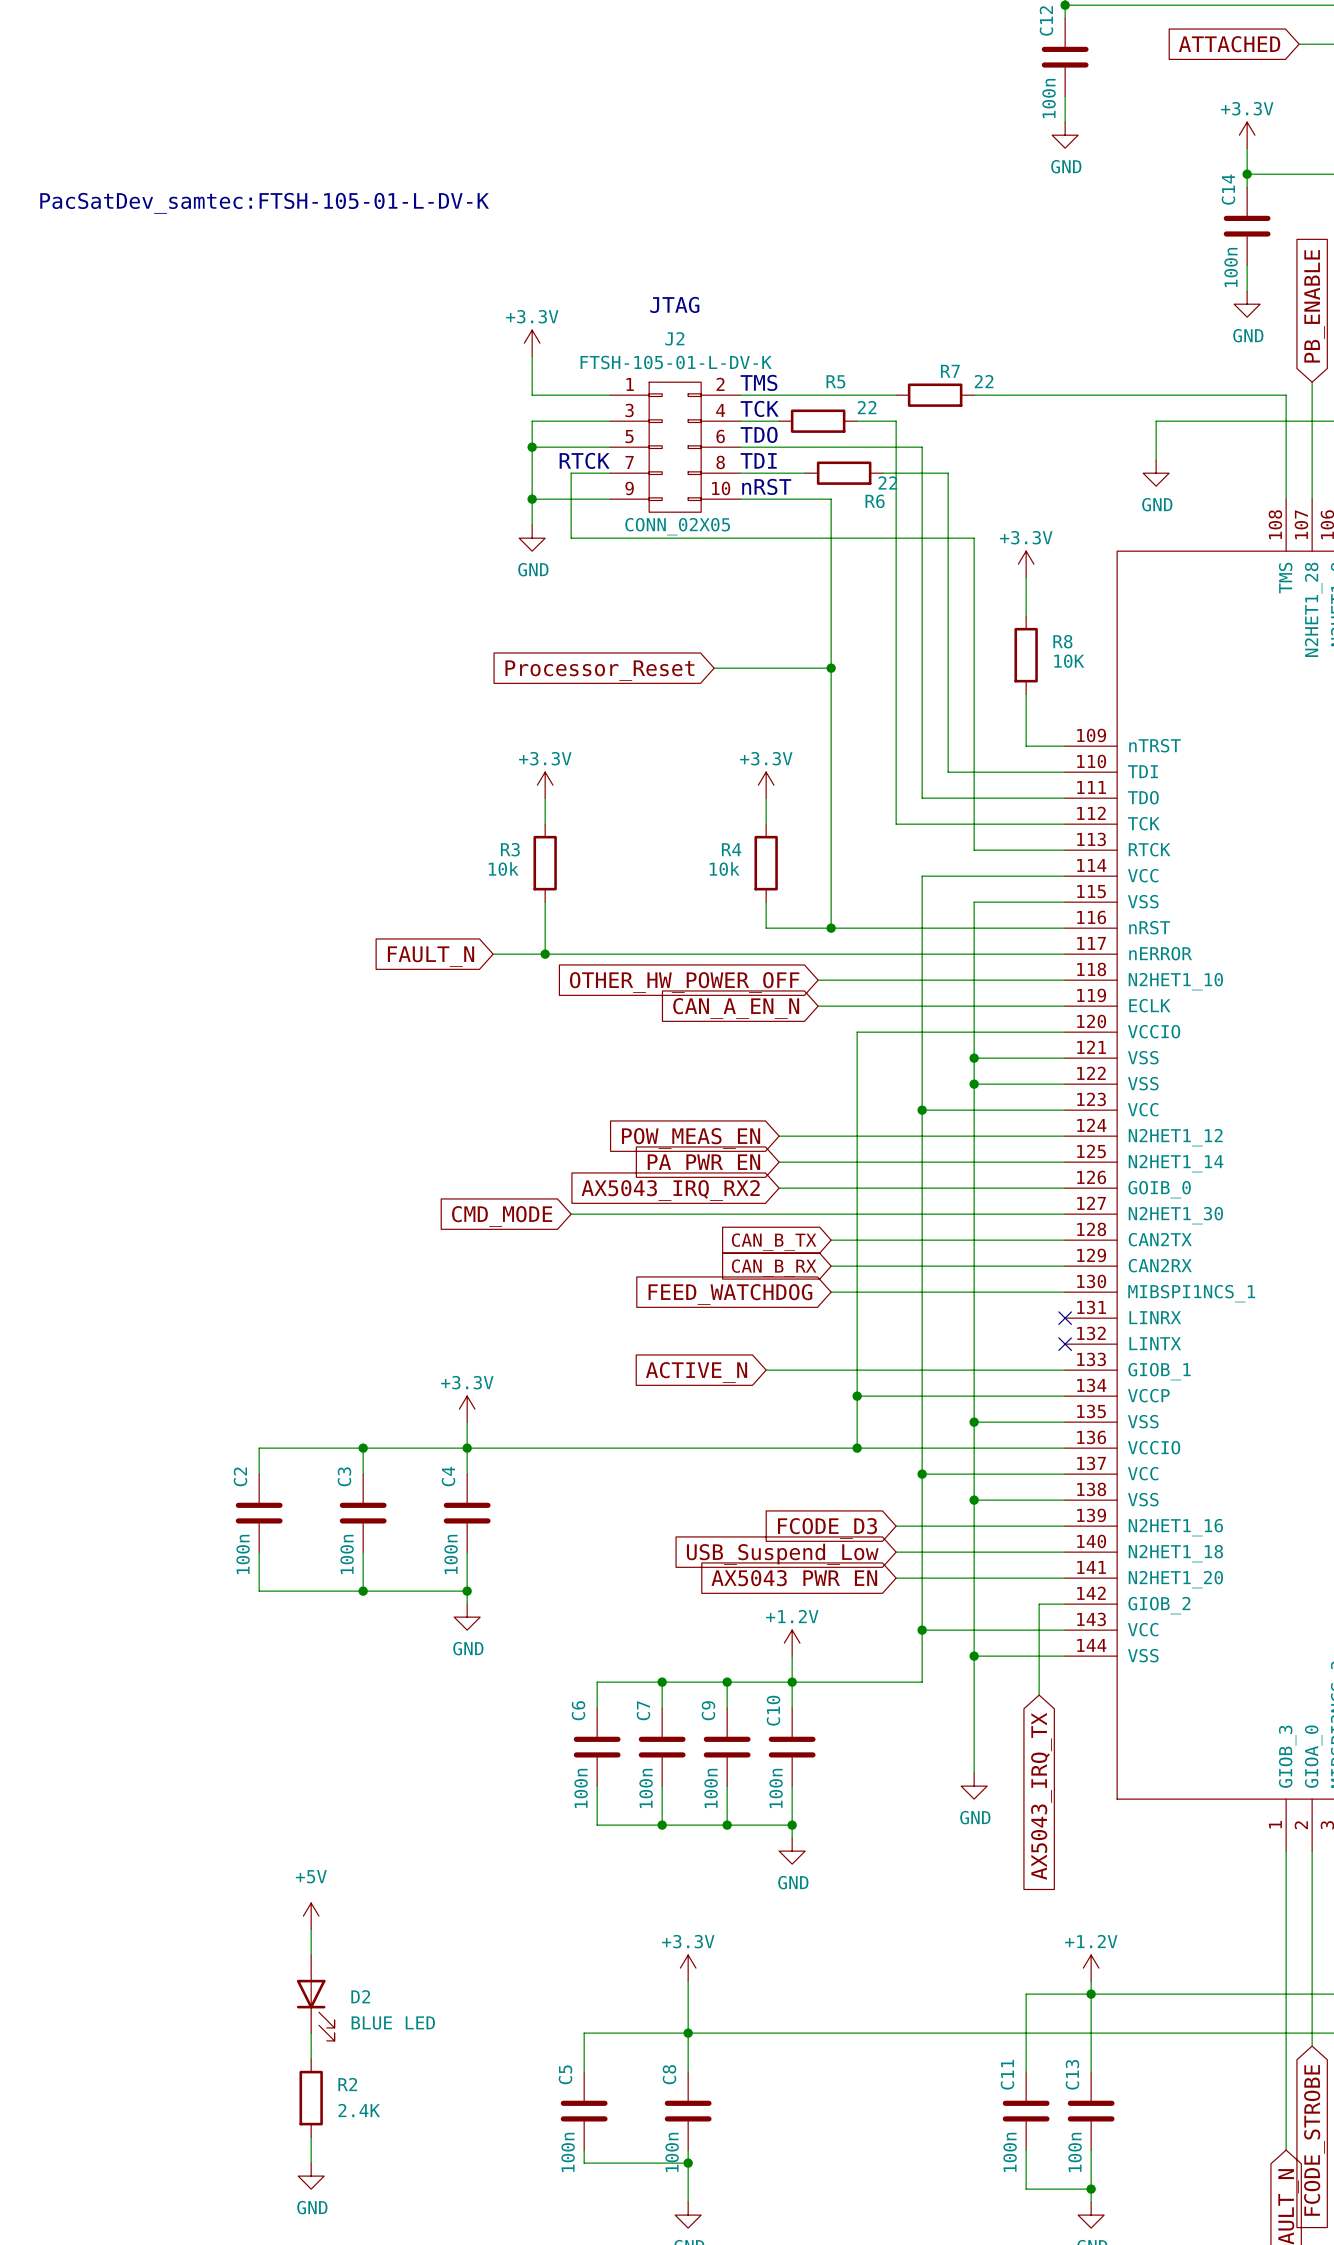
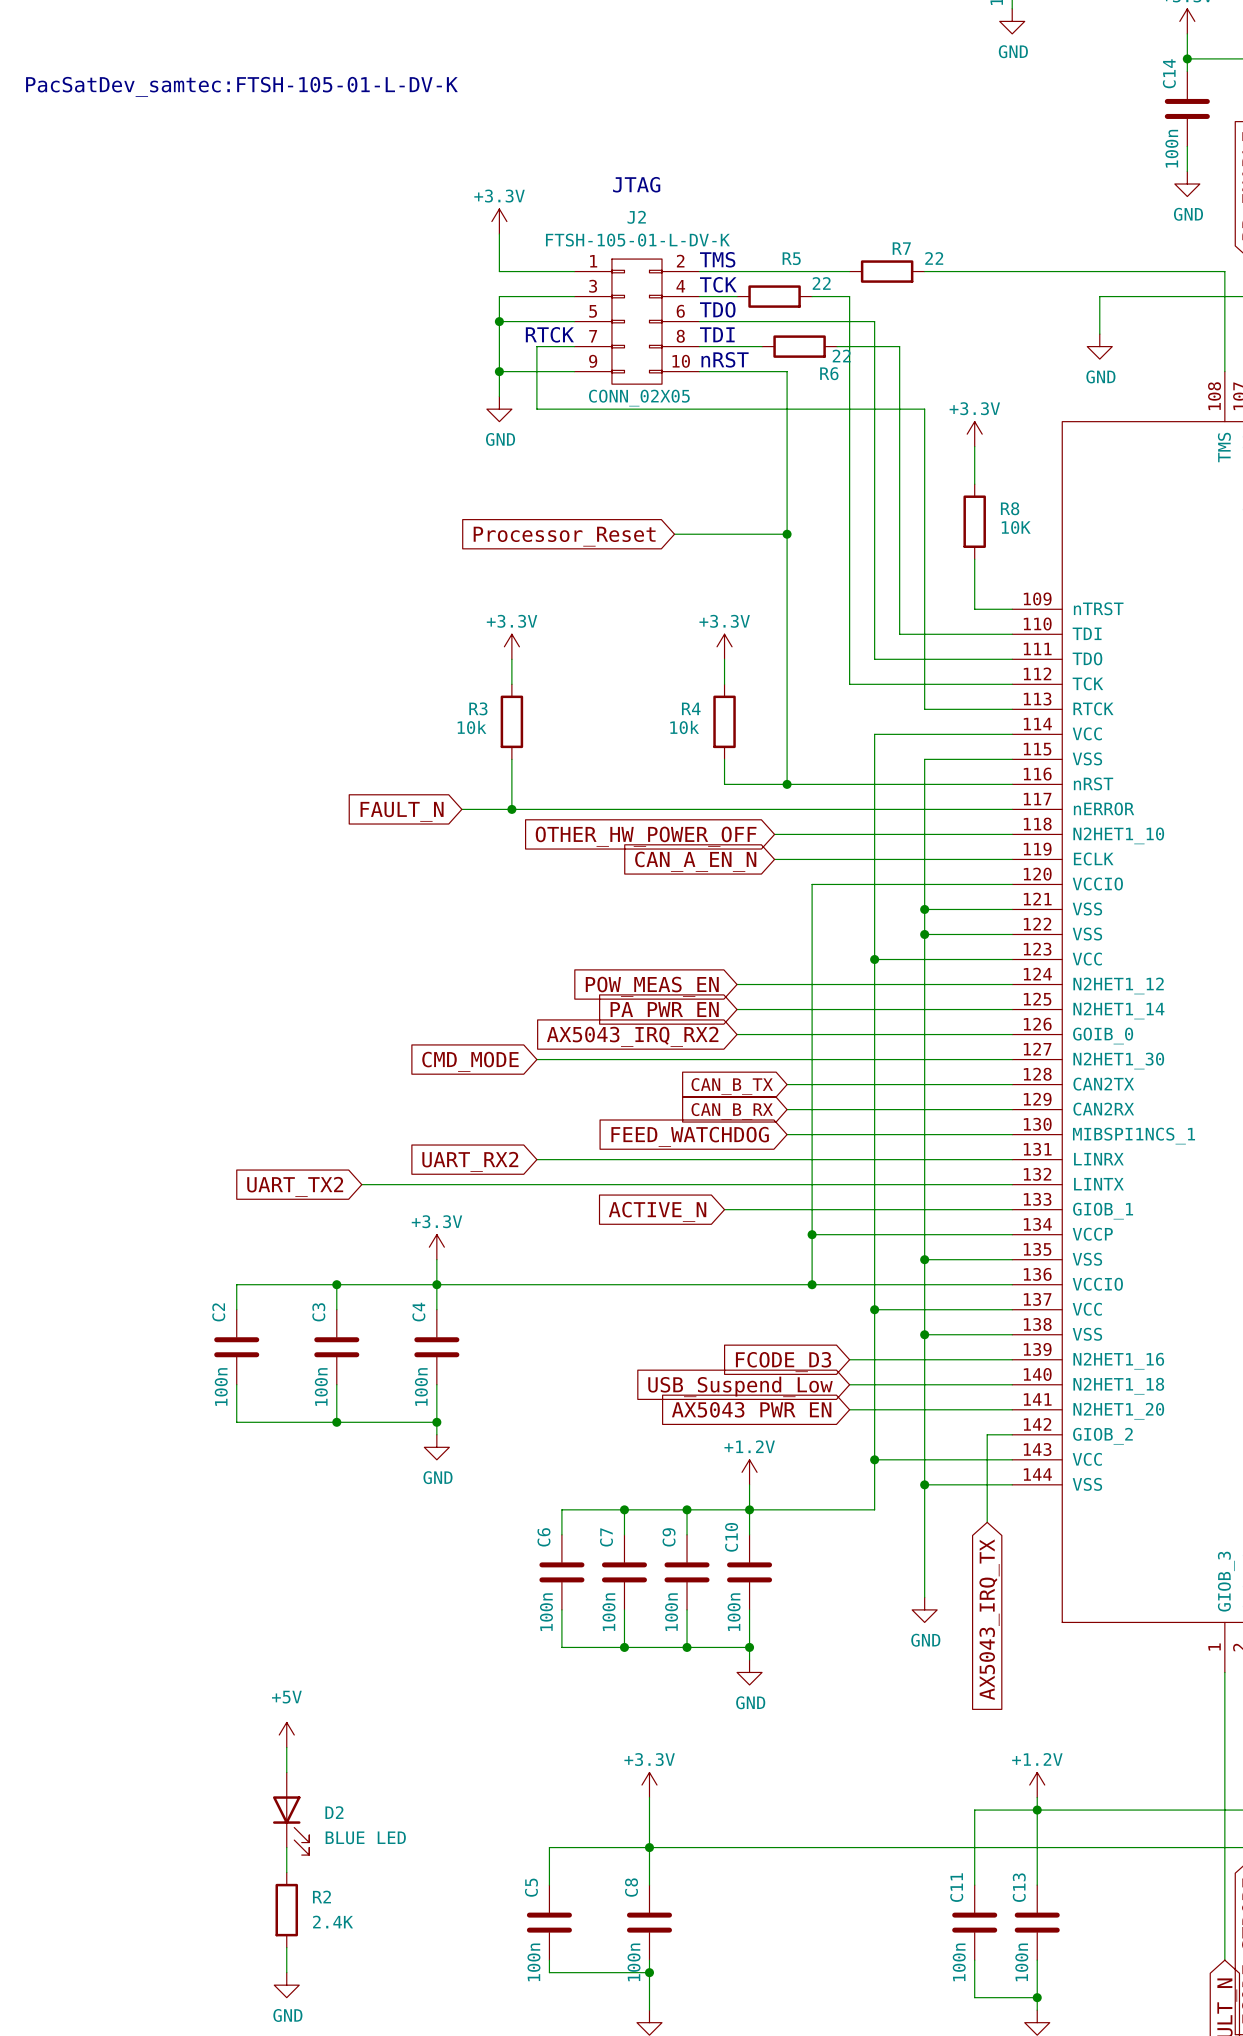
wire: none -> (536, 1159) (1012, 1159)
no-connect mark: (1065, 1318) -> none
global label: none -> UART_RX2 (470, 1161)
wire: none -> (361, 1184) (1012, 1184)
no-connect mark: (1065, 1344) -> none
global label: none -> UART_TX2 (295, 1186)

